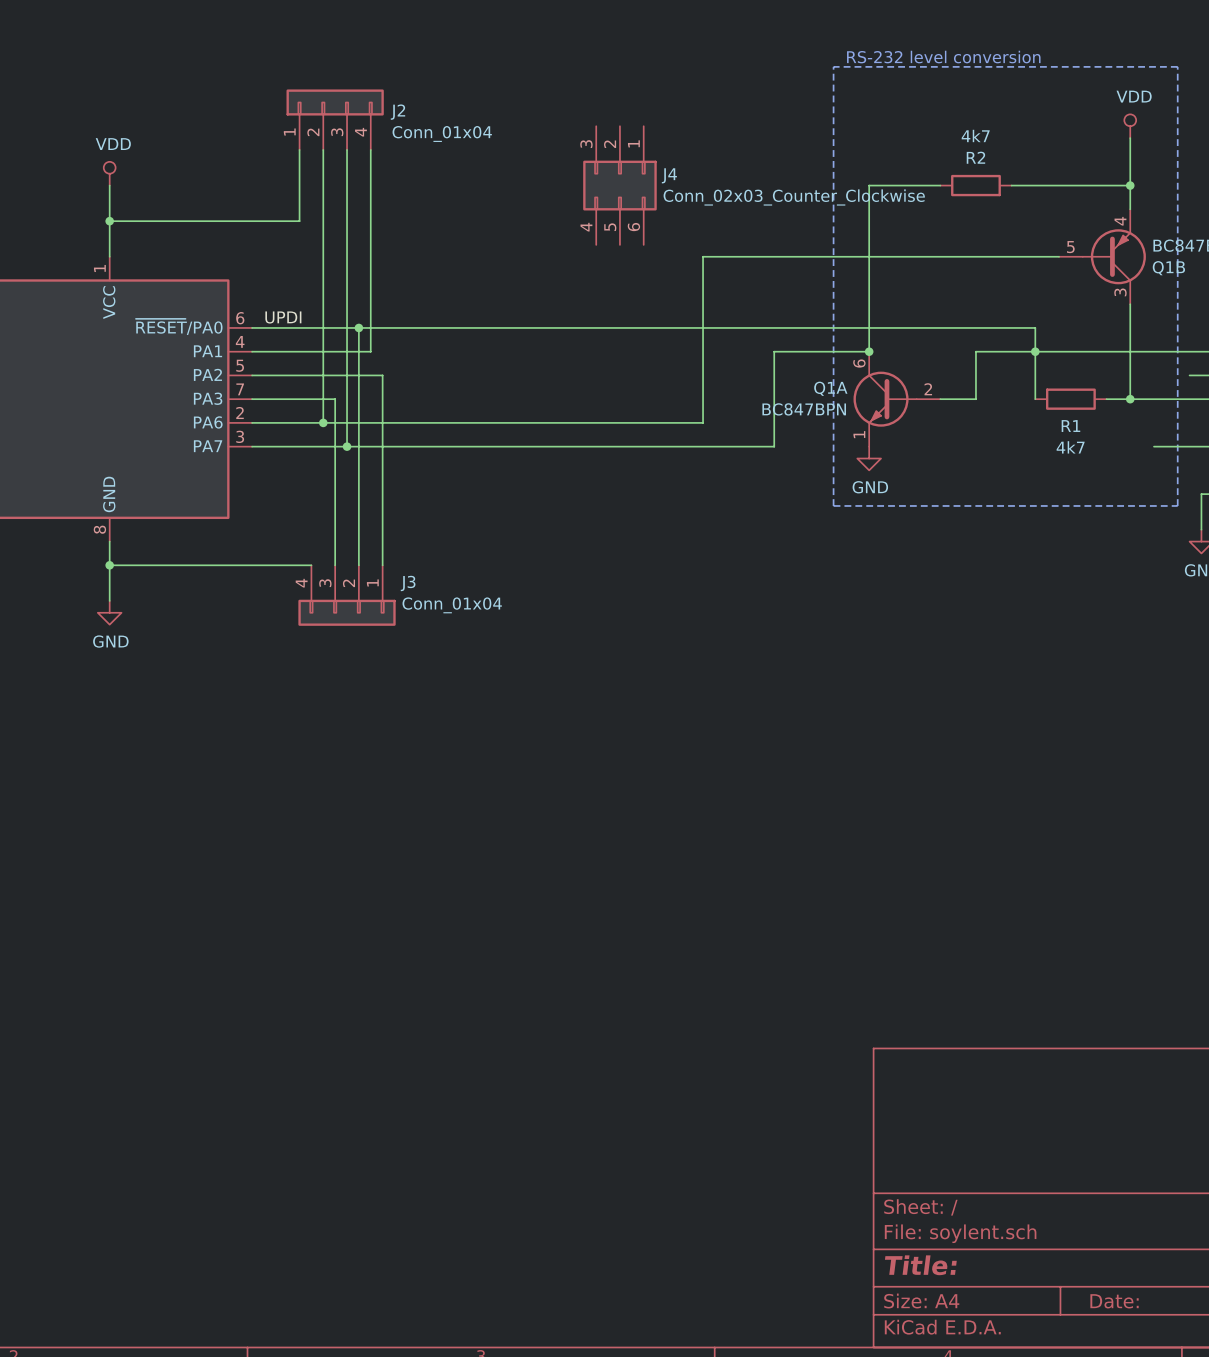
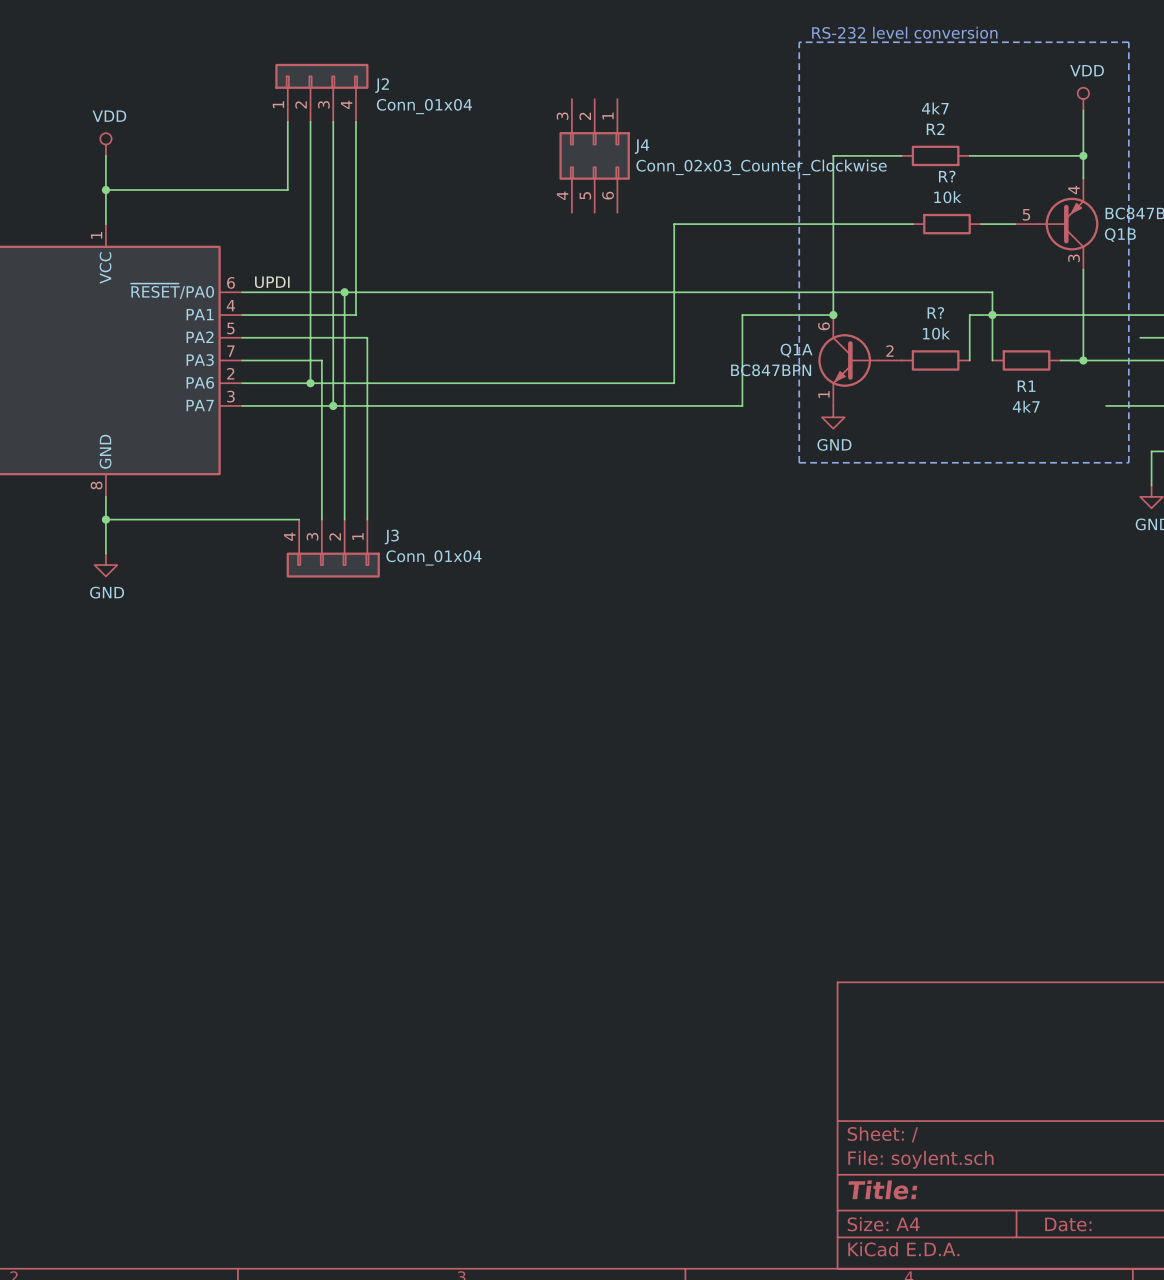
wire: (952, 256) (1023, 256) -> none
R?: none -> 10k (946, 224)
wire: (1011, 351) (975, 351) (975, 399) (940, 399) -> (969, 315) (969, 360)
R?: none -> 10k (935, 360)

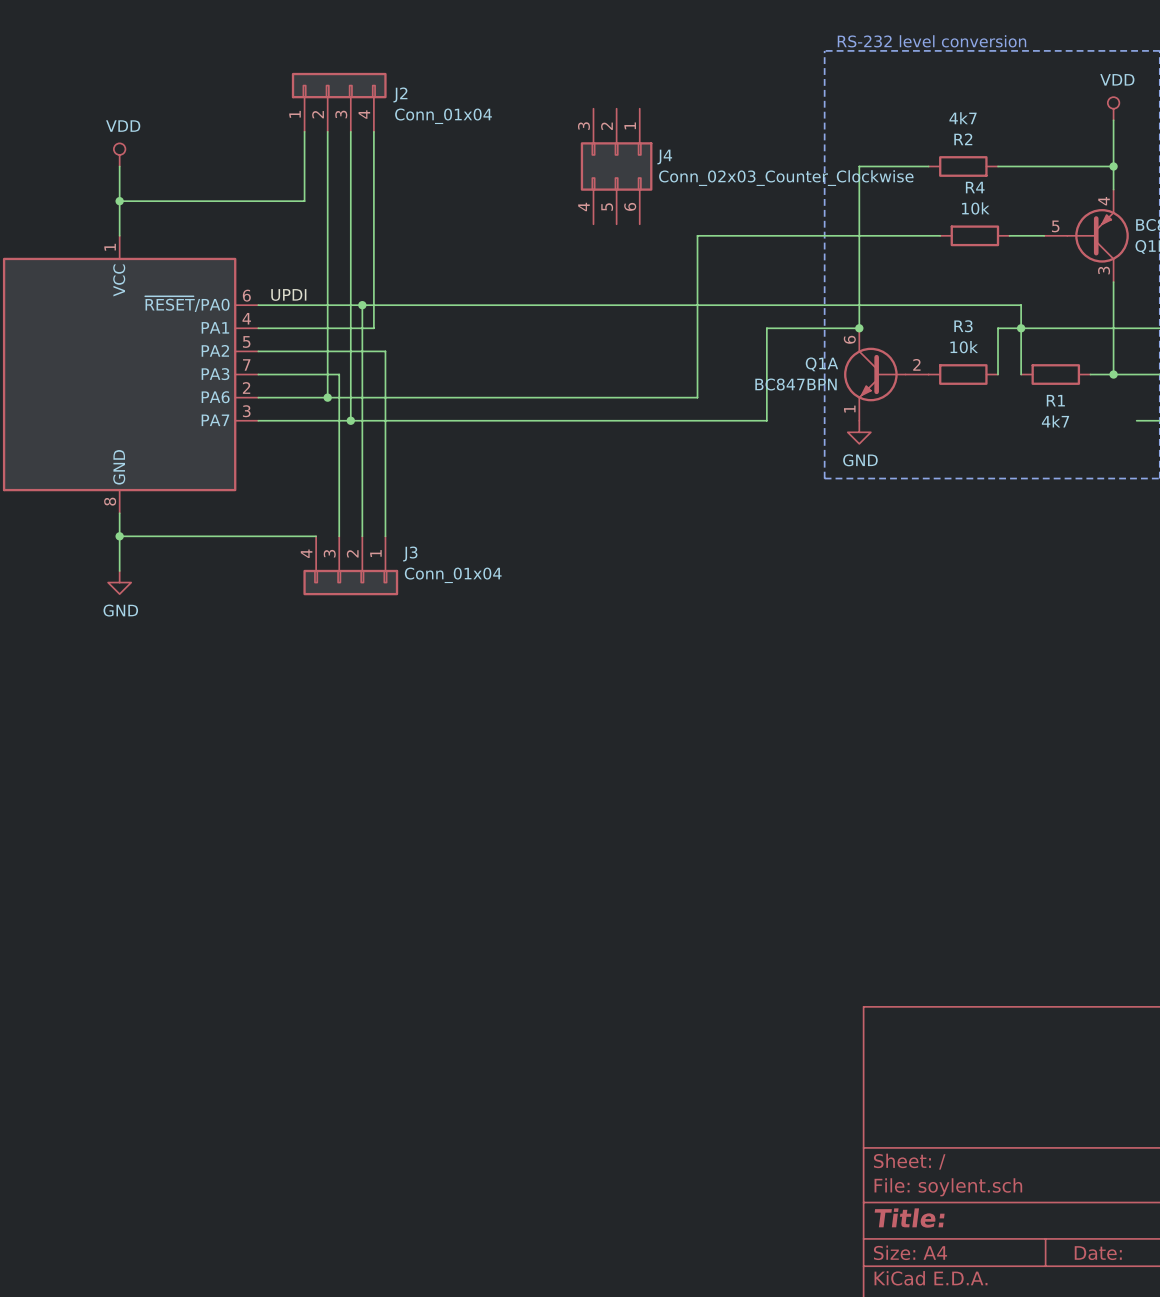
R? name: R? (947, 176) -> R4 (975, 187)
R? name: R? (935, 312) -> R3 (963, 326)

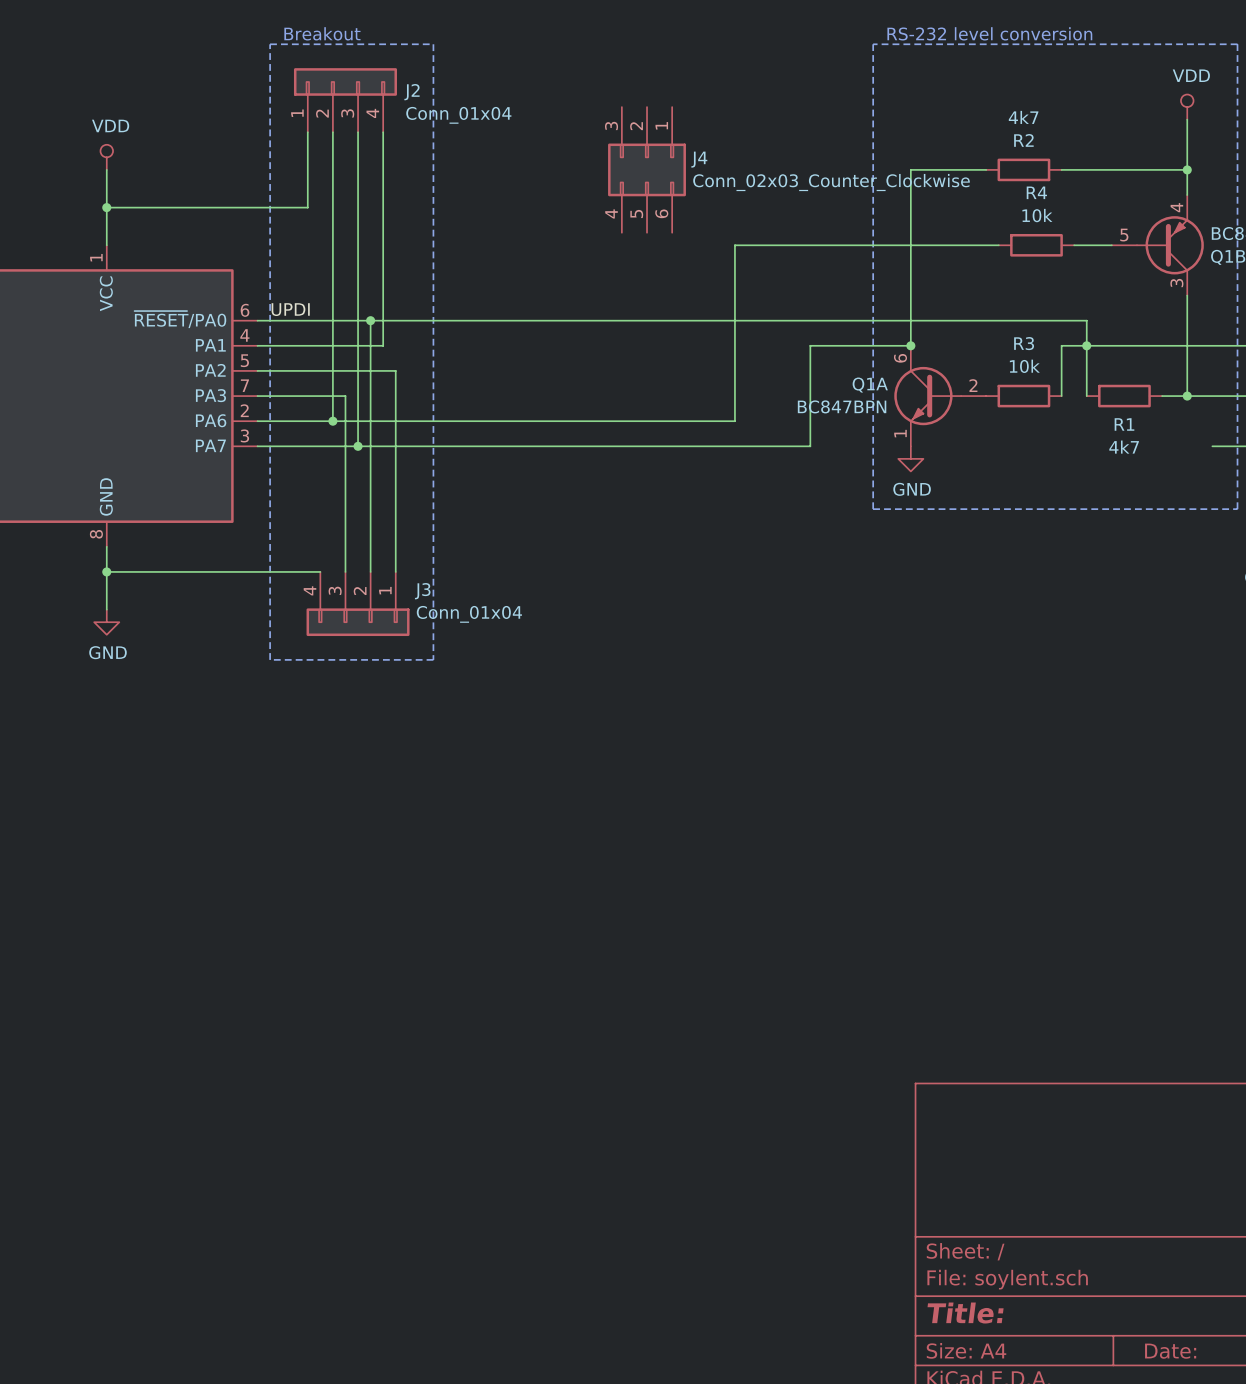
text: none -> Breakout (322, 33)
line: none -> (270, 44) (433, 44) (433, 659) (270, 659) (270, 44)

